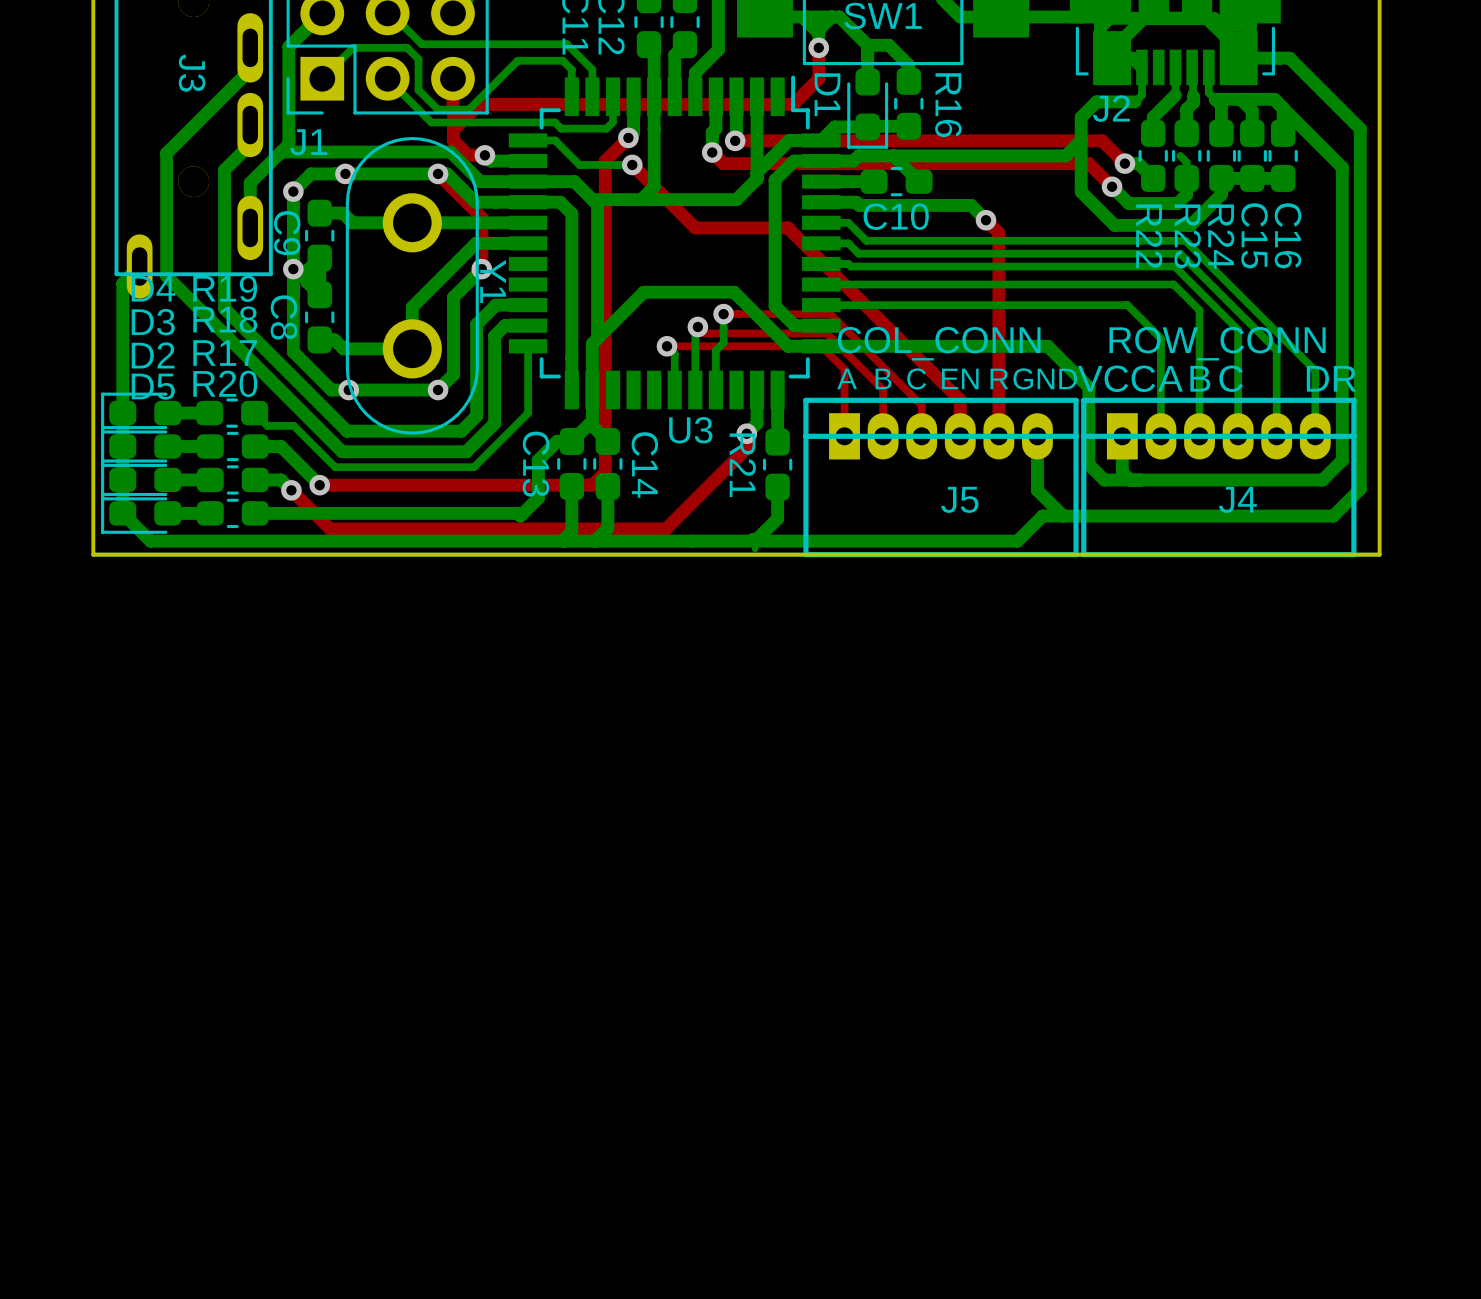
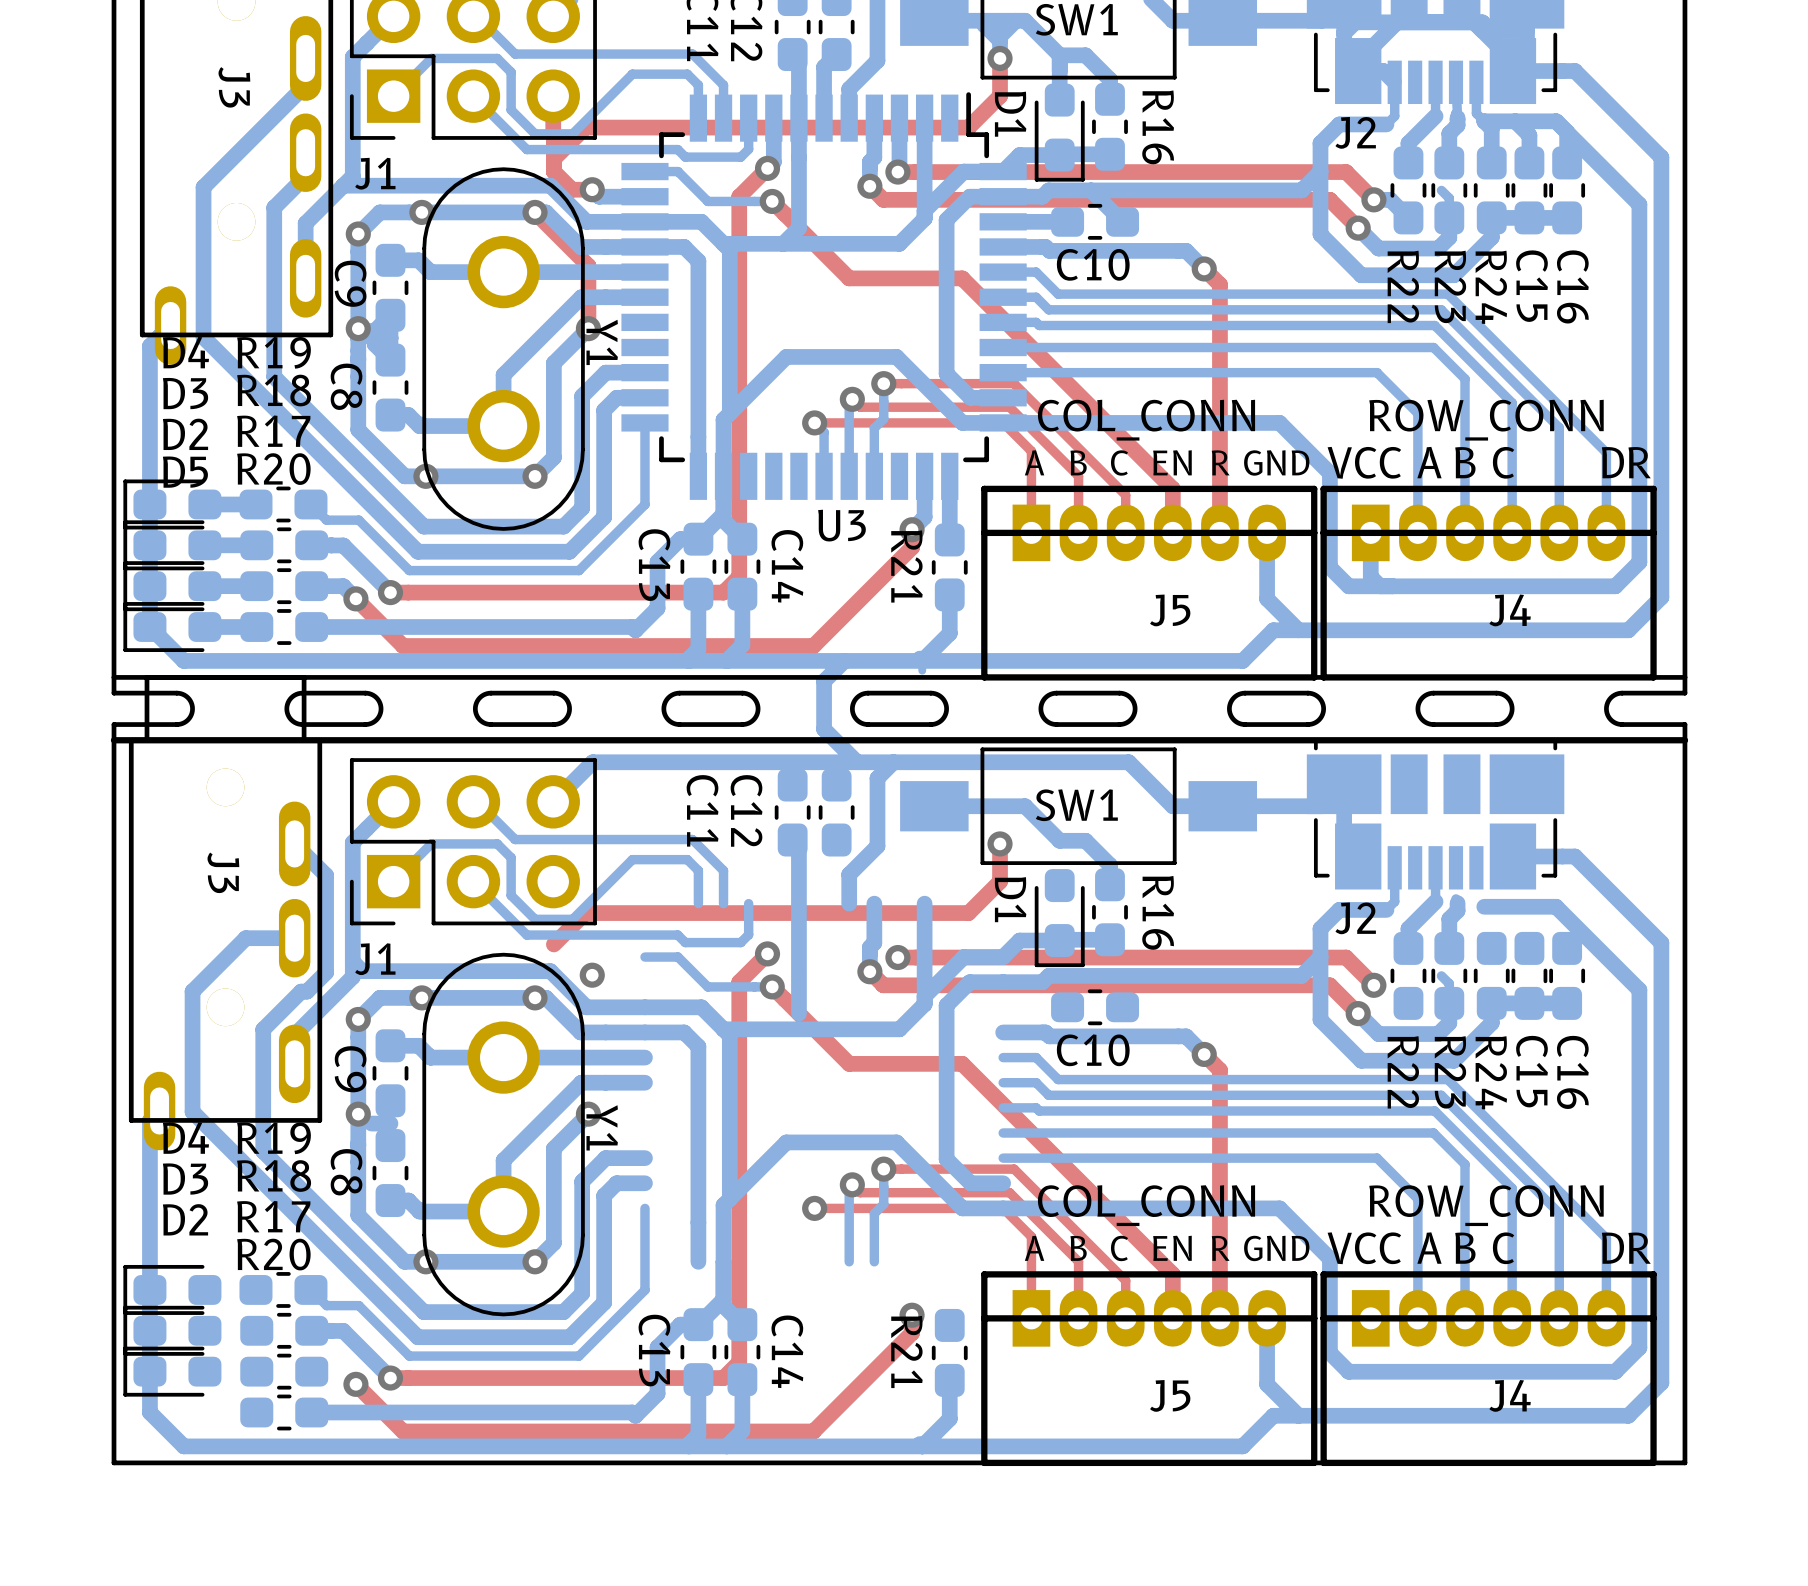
bottom track: none -> (844, 660) (824, 681) (824, 729) (857, 762)
board edge: (1379, 554) (93, 554) -> (1684, 677) (1684, 693) (1618, 693) (1609, 699) (1606, 708) (1609, 718) (1618, 724) (1684, 724) (1684, 1462) (114, 1462) (114, 724) (180, 724) (189, 718) (192, 708) (189, 699) (180, 693) (114, 693) (114, 677)
board edge: none -> (365, 693) (298, 693) (288, 700) (287, 712) (292, 721) (300, 724) (369, 724) (377, 718) (380, 706) (374, 696) (365, 693)
board edge: none -> (553, 693) (486, 693) (477, 700) (475, 712) (481, 721) (488, 724) (557, 724) (566, 718) (569, 706) (563, 696) (553, 693)
board edge: none -> (742, 693) (675, 693) (665, 700) (664, 712) (669, 721) (677, 724) (746, 724) (754, 718) (757, 706) (751, 696) (742, 693)
board edge: none -> (930, 693) (863, 693) (854, 700) (852, 712) (858, 721) (866, 724) (934, 724) (943, 718) (946, 706) (940, 696) (930, 693)
board edge: none -> (1119, 693) (1052, 693) (1042, 700) (1041, 712) (1047, 721) (1054, 724) (1123, 724) (1131, 718) (1134, 706) (1128, 696) (1119, 693)
board edge: none -> (1307, 693) (1241, 693) (1231, 700) (1229, 712) (1235, 721) (1243, 724) (1311, 724) (1320, 718) (1323, 706) (1317, 696) (1307, 693)
board edge: none -> (1496, 693) (1429, 693) (1420, 700) (1418, 712) (1424, 721) (1431, 724) (1500, 724) (1508, 718) (1512, 706) (1506, 696) (1496, 693)
line: none -> (1684, 740) (114, 740)
bottom track: none -> (893, 762) (877, 778) (877, 846) (849, 874) (849, 903)
bottom track: none -> (393, 801) (352, 842) (352, 976) (294, 1035) (294, 1063)
bottom track: none -> (473, 801) (477, 801) (515, 839) (692, 839) (723, 870) (723, 903)
bottom track: none -> (553, 801) (592, 762) (1128, 762) (1172, 806) (1322, 806) (1344, 784) (1344, 842) (1358, 856)
bottom track: none -> (934, 806) (1025, 806) (1059, 840) (1085, 840) (1109, 865) (1109, 884)
SW1: none -> (1078, 806)
C11: none -> (792, 812)
C12: none -> (836, 812)
J2: none -> (1435, 813)
J1: none -> (473, 841)
bottom track: none -> (294, 843) (326, 875) (326, 972) (307, 991) (301, 991) (263, 1029) (263, 1151) (423, 1312) (563, 1312) (582, 1293) (582, 1181) (605, 1158) (644, 1158)
top track: none -> (1000, 843) (1000, 881) (968, 913) (585, 913) (553, 944)
via: none -> (1000, 843)
bottom track: none -> (798, 846) (798, 1013)
bottom track: none -> (1512, 856) (1574, 856) (1661, 942) (1661, 1382) (1628, 1415) (1273, 1415) (1242, 1446) (183, 1446) (149, 1412) (149, 1120) (159, 1111)
bottom track: none -> (1394, 867) (1394, 901) (1386, 909) (1339, 909) (1320, 928) (1320, 1019) (1361, 1060) (1454, 1060) (1491, 1023) (1491, 1003) (1567, 1003)
bottom track: none -> (1435, 867) (1435, 901) (1408, 928) (1408, 948)
bottom track: none -> (393, 881) (431, 843) (497, 843) (511, 857) (511, 895) (535, 919) (572, 919) (632, 859) (687, 859) (698, 870) (698, 903)
bottom track: none -> (473, 881) (526, 935) (677, 935) (685, 942) (740, 942) (748, 934) (748, 903)
bottom track: none -> (1455, 898) (1457, 910) (1449, 919) (1449, 948) (1455, 941)
bottom track: none -> (874, 903) (874, 942) (869, 947) (869, 971)
bottom track: none -> (924, 903) (924, 1004) (899, 1029) (723, 1029)
bottom track: none -> (1484, 906) (1556, 906) (1639, 990) (1639, 1347) (1615, 1371) (1348, 1371) (1329, 1352) (1329, 1258) (1279, 1208) (962, 1208) (896, 1142) (786, 1142) (723, 1205) (723, 1305) (742, 1324)
R16: none -> (1109, 912)
J3: none -> (225, 912)
D1: none -> (1059, 918)
bottom track: none -> (294, 938) (245, 938) (192, 991) (192, 1111) (417, 1337) (569, 1337) (604, 1302) (604, 1195) (616, 1183) (644, 1183)
bottom track: none -> (1109, 939) (1019, 940) (1003, 957) (963, 957) (924, 996)
top track: none -> (767, 953) (739, 982) (739, 1362) (723, 1378) (390, 1378)
via: none -> (767, 953)
bottom track: none -> (644, 957) (677, 957) (707, 986) (772, 986)
bottom track: none -> (1320, 957) (1301, 975) (1048, 975) (1042, 982) (969, 982) (946, 1005) (946, 1159) (970, 1183) (1003, 1183)
top track: none -> (897, 957) (1346, 957) (1373, 985)
via: none -> (897, 957)
bottom track: none -> (352, 961) (362, 971) (550, 971) (586, 1007) (701, 1007) (729, 1035) (729, 1198)
top track: none -> (869, 971) (883, 985) (1329, 985) (1358, 1013)
via: none -> (869, 971)
via: none -> (592, 975)
R22: none -> (1408, 975)
bottom track: none -> (1441, 975) (1449, 983) (1449, 1023) (1438, 1034) (1378, 1034) (1358, 1013)
R23: none -> (1449, 975)
R24: none -> (1491, 975)
C15: none -> (1529, 975)
C16: none -> (1567, 975)
via: none -> (1373, 985)
top track: none -> (772, 986) (849, 1063) (962, 1063) (1172, 1274) (1172, 1318)
via: none -> (772, 986)
via: none -> (421, 997)
via: none -> (535, 997)
C10: none -> (1095, 1007)
via: none -> (1358, 1013)
via: none -> (358, 1019)
bottom track: none -> (1003, 1032) (1045, 1032) (1049, 1036) (1186, 1036) (1204, 1054)
bottom track: none -> (390, 1045) (418, 1045) (430, 1057) (644, 1057)
top track: none -> (1204, 1054) (1219, 1070) (1219, 1318)
via: none -> (1204, 1054)
bottom track: none -> (1003, 1057) (1036, 1057) (1058, 1079) (1447, 1079) (1606, 1238) (1606, 1318)
C9: none -> (390, 1073)
bottom track: none -> (644, 1082) (581, 1082) (503, 1160) (503, 1211)
bottom track: none -> (1003, 1082) (1036, 1082) (1048, 1095) (1441, 1095) (1559, 1213) (1559, 1318)
bottom track: none -> (1003, 1107) (1036, 1107) (1039, 1111) (1434, 1111) (1512, 1188) (1512, 1318)
via: none -> (358, 1114)
bottom track: none -> (588, 1114) (553, 1148) (553, 1242) (535, 1261) (404, 1261) (358, 1215) (358, 1019) (379, 997) (546, 997) (580, 1032) (684, 1032) (698, 1046) (698, 1261)
via: none -> (588, 1114)
bottom track: none -> (390, 1123) (371, 1123)
bottom track: none -> (1003, 1132) (1433, 1132) (1465, 1164) (1465, 1318)
Y1: none -> (503, 1134)
bottom track: none -> (1003, 1158) (1377, 1158) (1417, 1198) (1417, 1318)
bottom track: none -> (883, 1169) (883, 1204) (874, 1213) (874, 1261)
top track: none -> (883, 1169) (1014, 1169) (1125, 1280) (1125, 1318)
via: none -> (883, 1169)
C8: none -> (390, 1173)
bottom track: none -> (852, 1184) (849, 1187) (849, 1261)
top track: none -> (852, 1184) (860, 1192) (1009, 1192) (1078, 1261) (1078, 1318)
via: none -> (852, 1184)
bottom track: none -> (390, 1200) (408, 1200) (419, 1211) (503, 1211)
text: none -> COL_CONN (1146, 1205)
text: none -> ROW_CONN (1486, 1205)
bottom track: none -> (644, 1208) (644, 1290) (579, 1356) (409, 1356) (358, 1305) (326, 1305) (310, 1289)
top track: none -> (814, 1208) (1003, 1208) (1031, 1236) (1031, 1318)
via: none -> (814, 1208)
text: none -> VCC (1364, 1248)
text: none -> A (1429, 1248)
text: none -> B (1465, 1248)
text: none -> C (1503, 1248)
text: none -> DR (1626, 1248)
text: none -> A (1034, 1248)
text: none -> B (1078, 1248)
text: none -> C (1119, 1248)
text: none -> EN (1172, 1248)
text: none -> R (1220, 1248)
text: none -> GND (1276, 1248)
via: none -> (425, 1261)
via: none -> (535, 1261)
D4: none -> (172, 1289)
R19: none -> (283, 1289)
bottom track: none -> (723, 1299) (698, 1324) (680, 1324) (657, 1347) (657, 1393) (635, 1415) (632, 1412) (311, 1412)
top track: none -> (912, 1315) (912, 1333) (813, 1431) (403, 1431) (355, 1384)
via: none -> (912, 1315)
bottom track: none -> (1267, 1318) (1267, 1384) (1298, 1415)
D3: none -> (172, 1330)
R18: none -> (284, 1330)
bottom track: none -> (311, 1330) (343, 1330) (390, 1378)
C13: none -> (698, 1352)
C14: none -> (742, 1352)
R21: none -> (949, 1352)
J5: none -> (1149, 1368)
J4: none -> (1488, 1368)
D2: none -> (172, 1371)
R17: none -> (284, 1371)
via: none -> (390, 1378)
bottom track: none -> (698, 1379) (698, 1434) (688, 1446)
bottom track: none -> (742, 1379) (742, 1430) (726, 1446)
bottom track: none -> (949, 1380) (949, 1418) (922, 1446) (919, 1444)
via: none -> (355, 1384)
R20: none -> (284, 1412)

